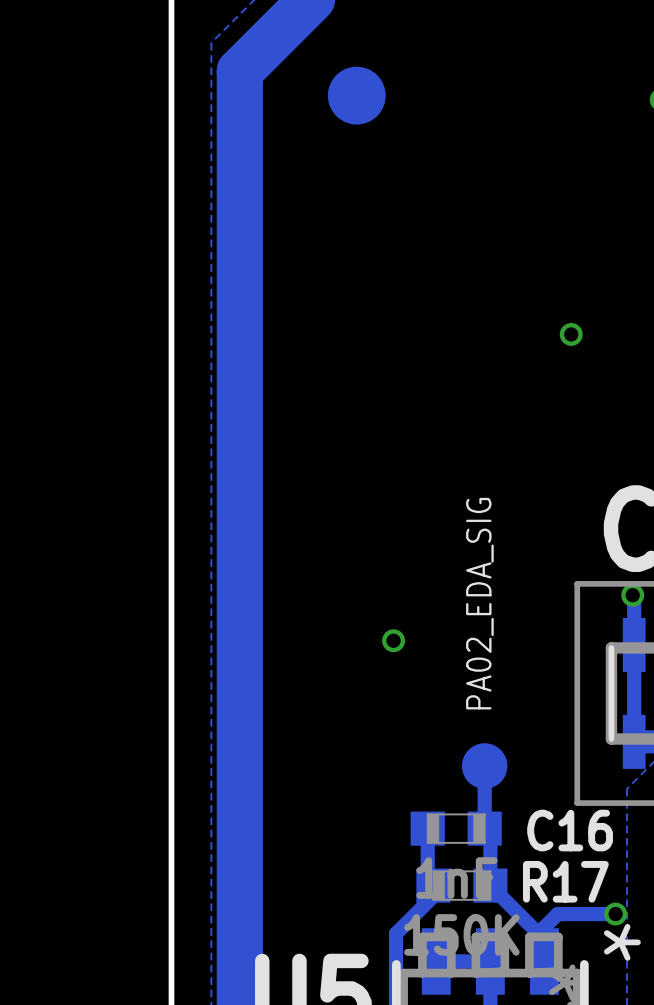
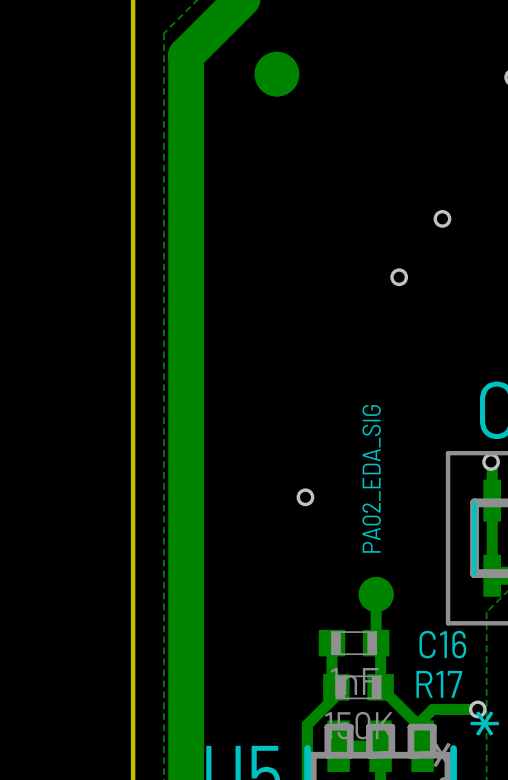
via: none -> (442, 218)
via: (571, 334) -> none
via: none -> (399, 277)

